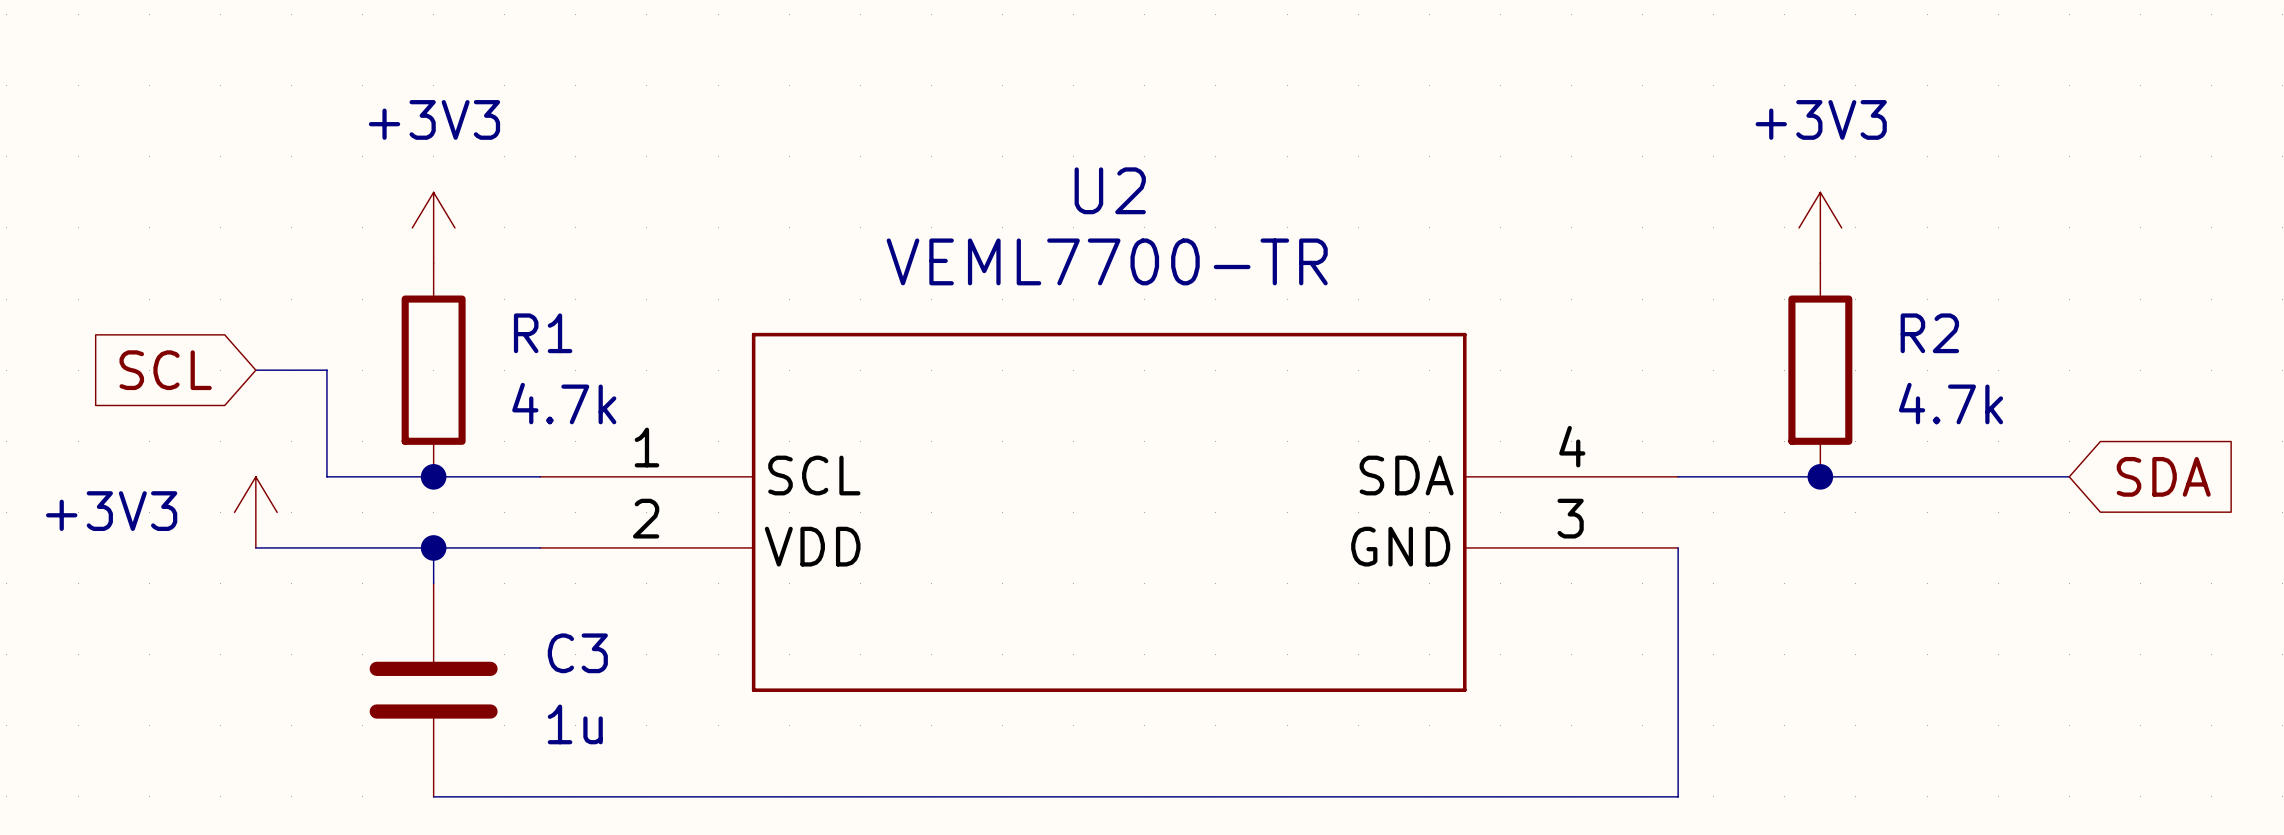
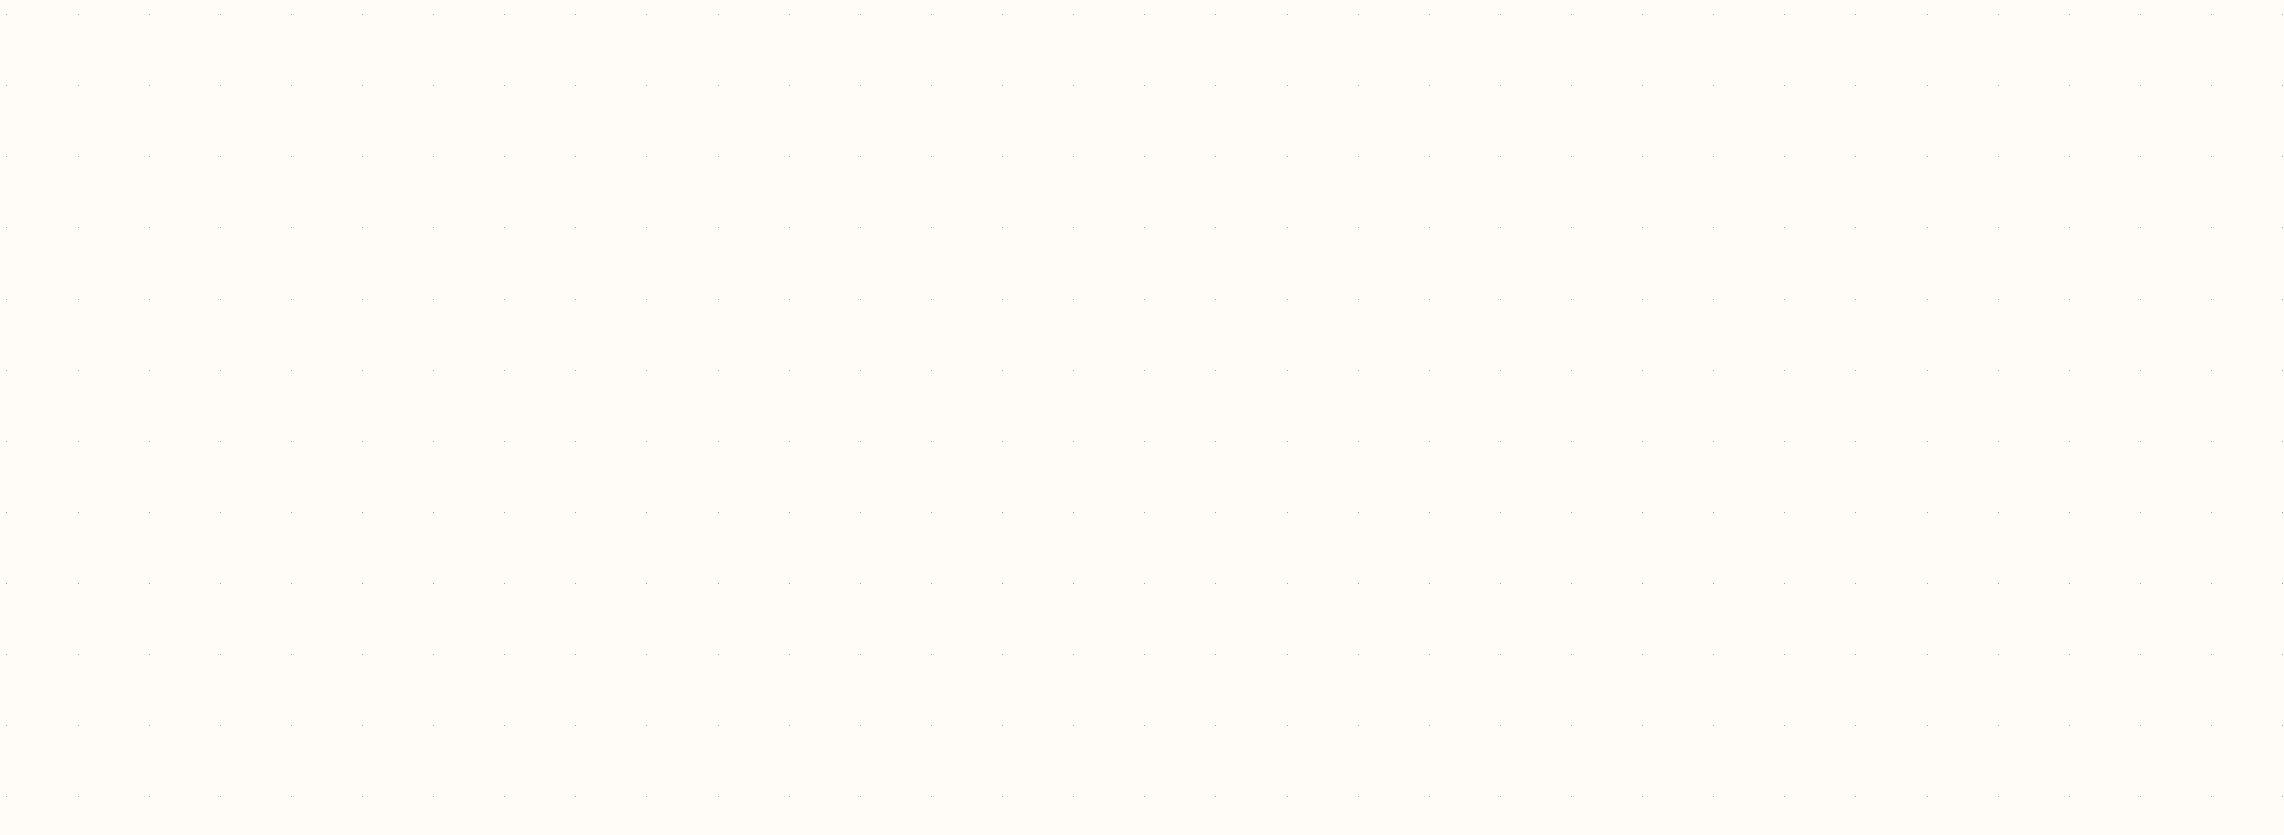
power symbol: +3V3 (433, 227) -> none
power symbol: +3V3 (1820, 227) -> none
global label: SCL (165, 370) -> none
wire: (255, 370) (326, 370) (326, 476) (540, 476) -> none
R1: 4.7k (433, 370) -> none
R2: 4.7k (1820, 370) -> none
junction: (433, 476) -> none
wire: (1678, 476) (2069, 476) -> none
junction: (1820, 476) -> none
global label: SDA (2163, 476) -> none
power symbol: +3V3 (255, 512) -> none
U2: VEML7700-TR (1109, 512) -> none
wire: (255, 547) (540, 547) -> none
wire: (433, 547) (433, 583) -> none
junction: (433, 547) -> none
wire: (1678, 547) (1678, 796) (433, 796) -> none
C3: 1u (433, 690) -> none

